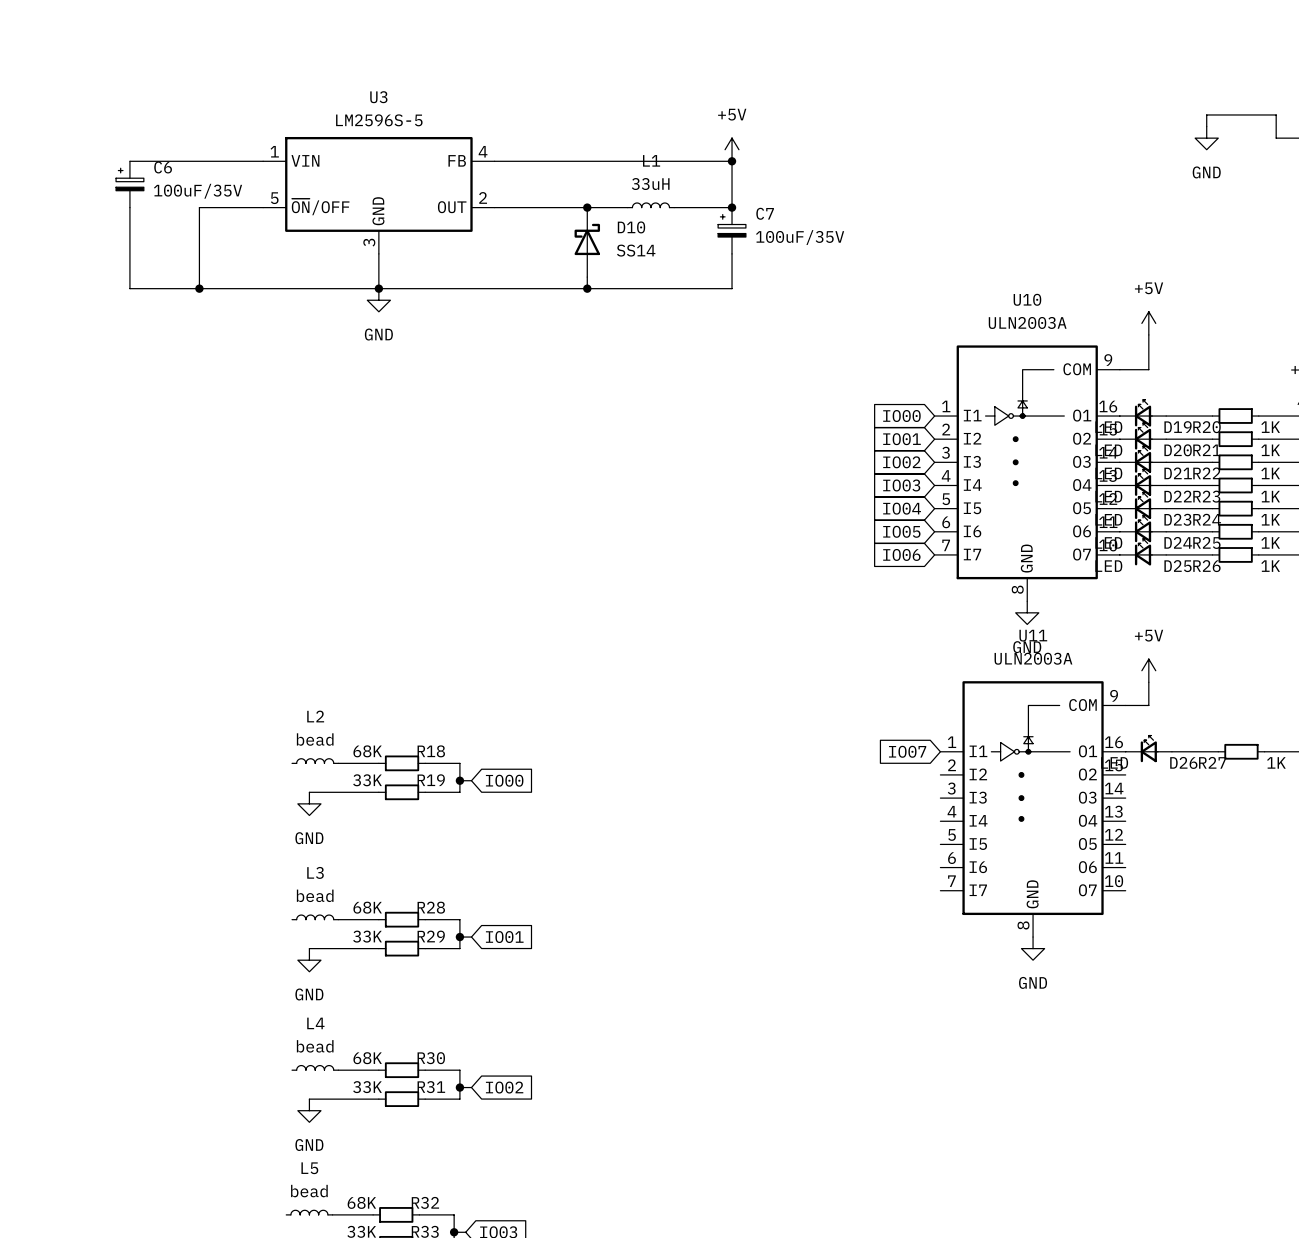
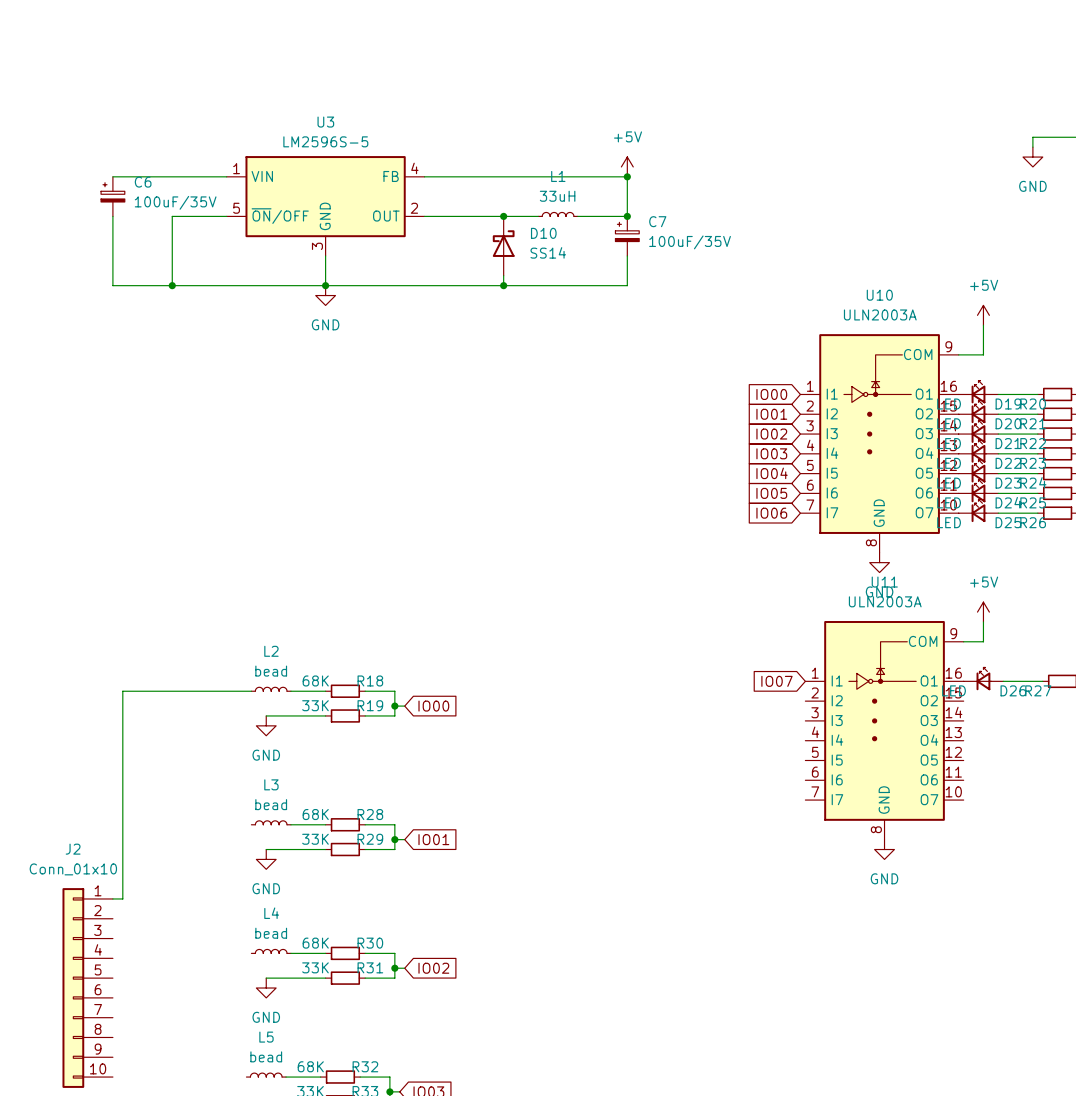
wire: none -> (251, 691) (122, 691) (122, 898) (112, 898)
J2: none -> Conn_01x10 (87, 988)

